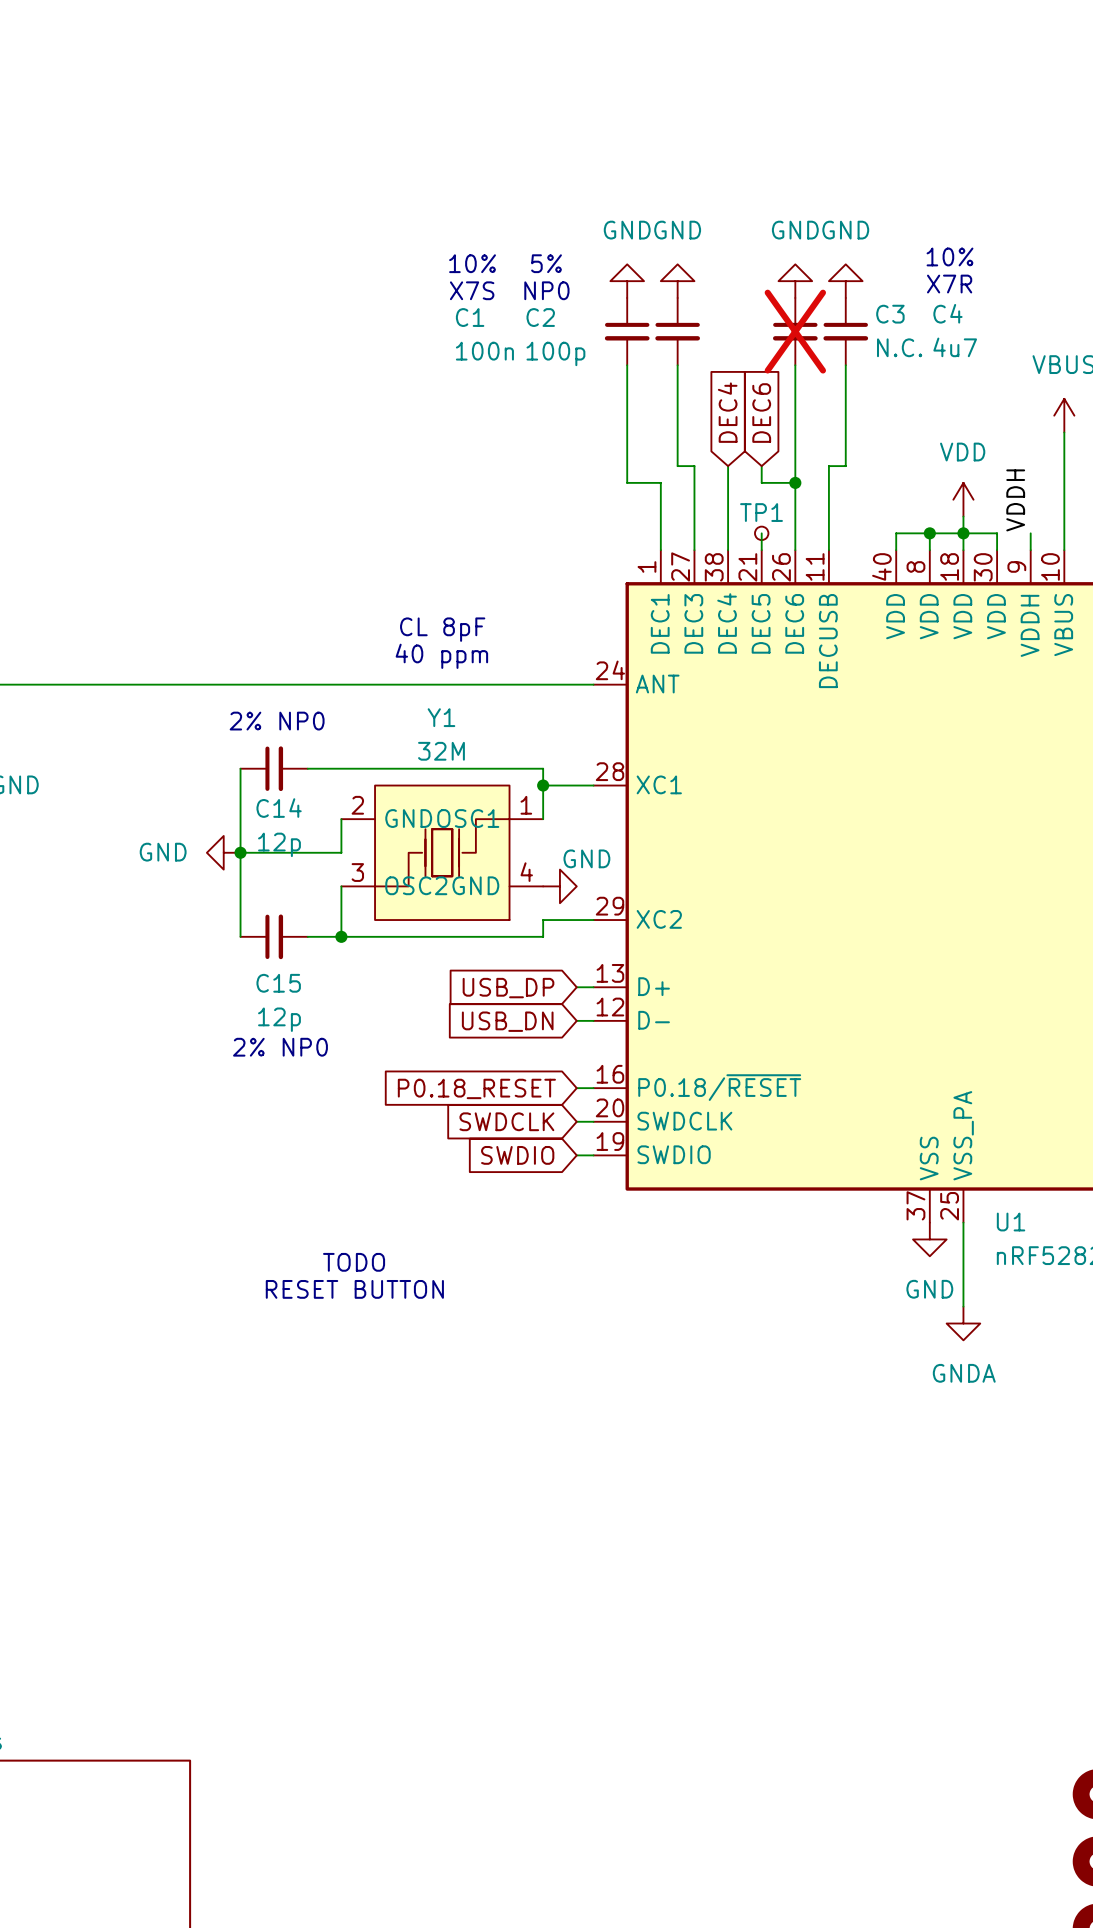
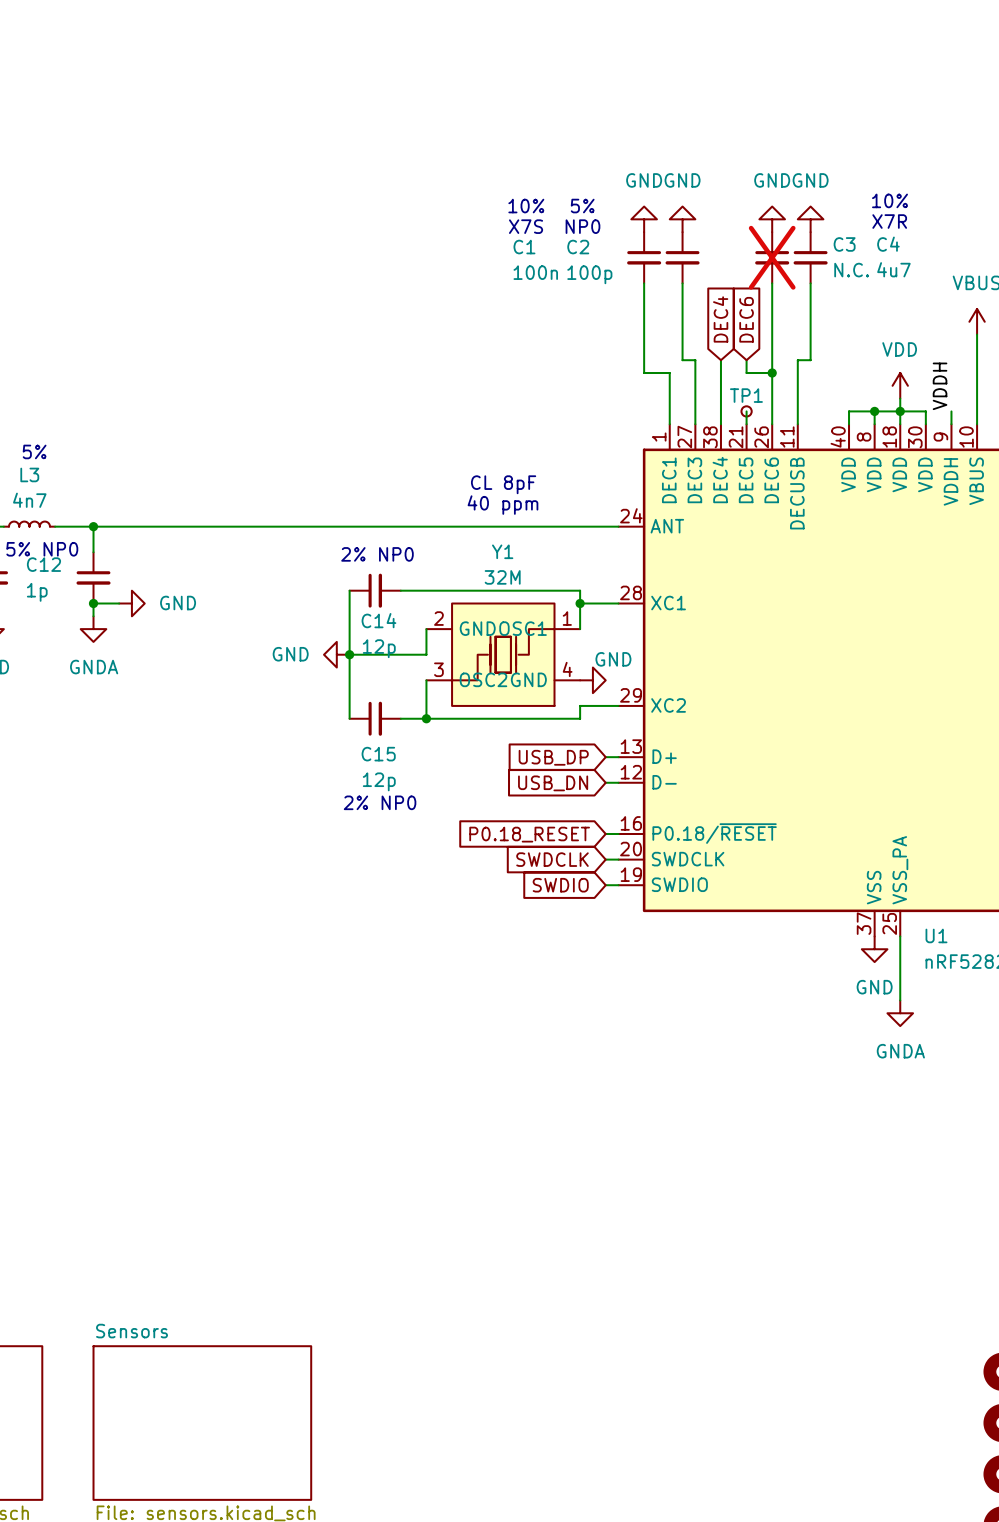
text: TODO (354, 1262) -> none
text: RESET BUTTON (354, 1289) -> none

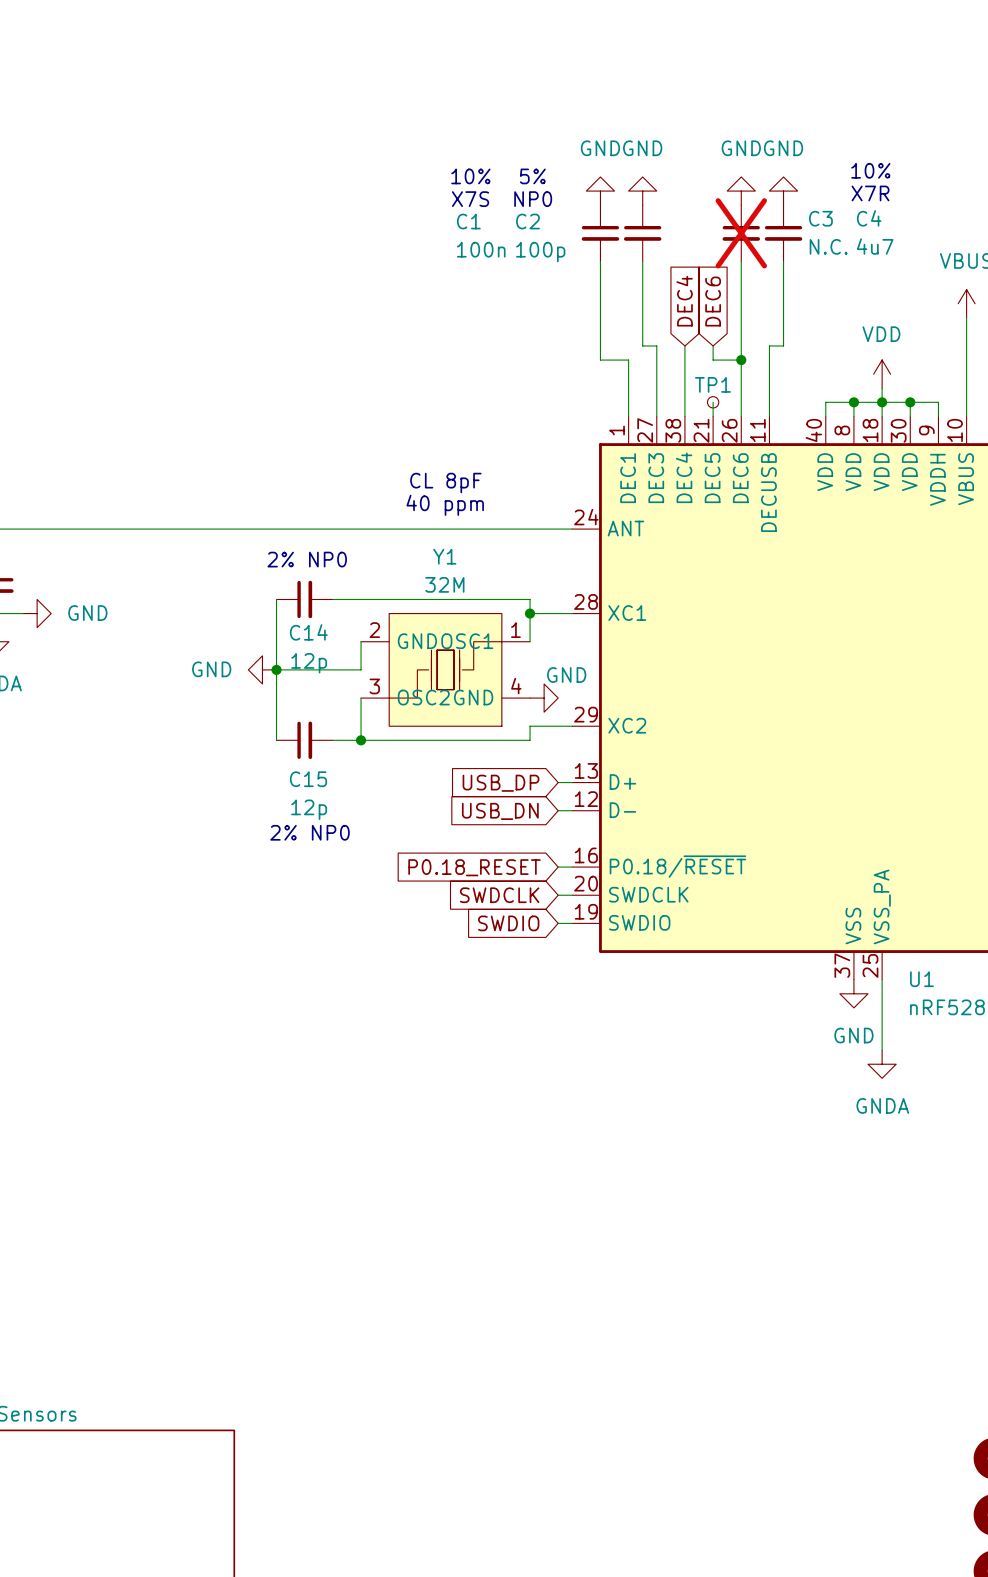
label: VDDH (940, 386) -> none
wire: none -> (910, 402) (938, 402)
junction: none -> (910, 402)

